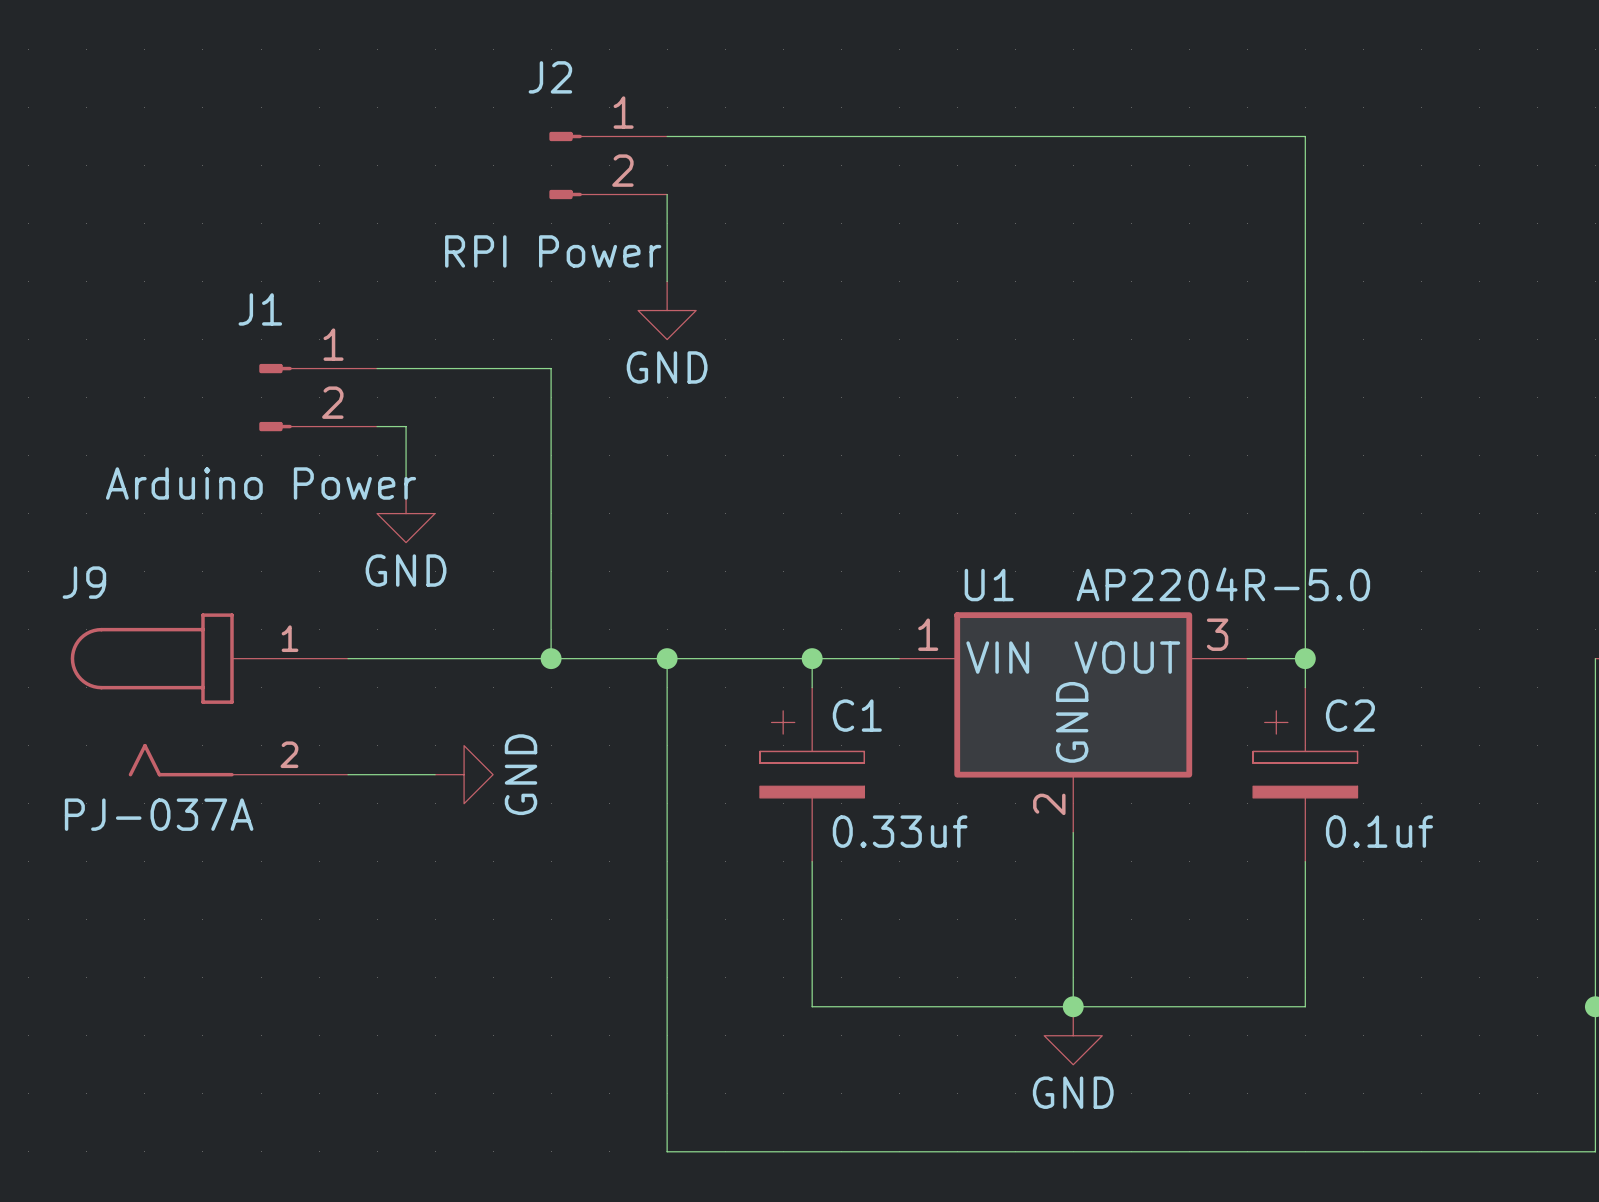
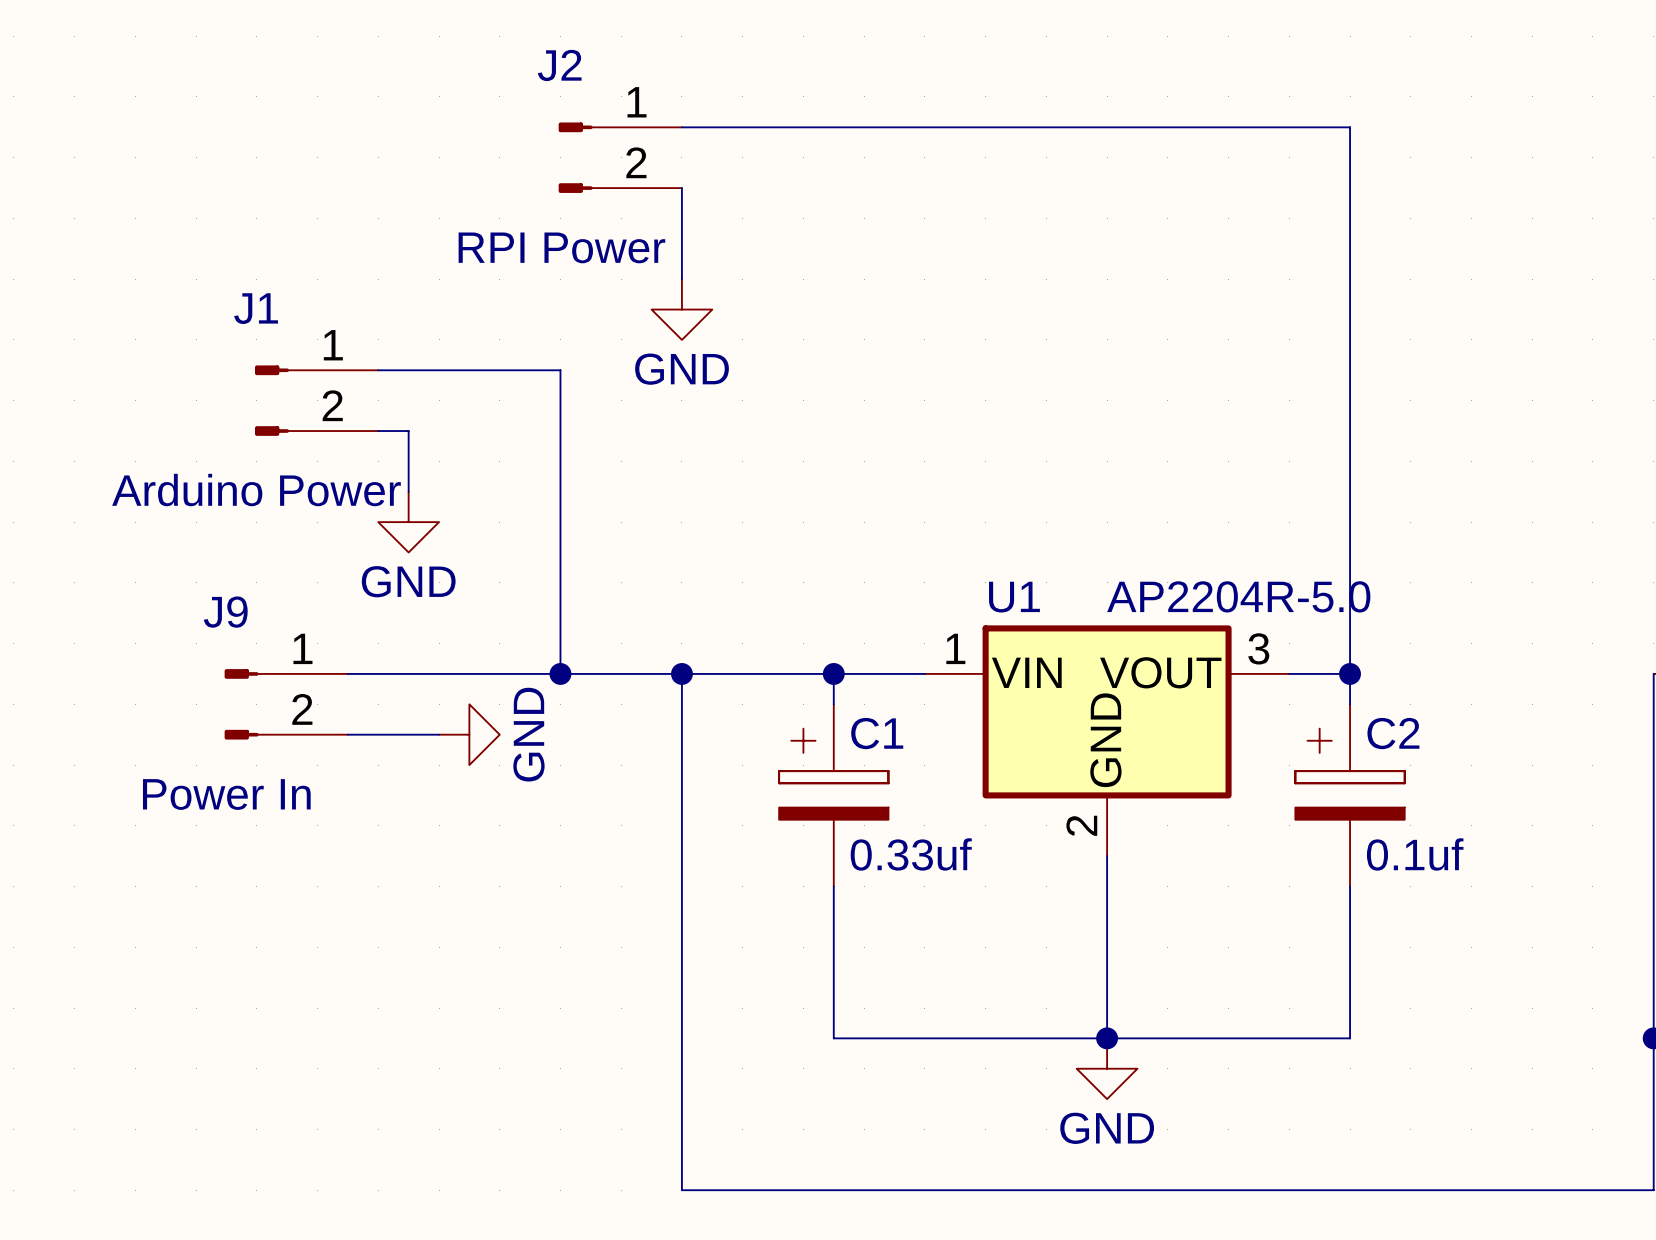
J9 name position: J9 (84, 582) -> J9 (225, 612)
J9 symbol: [70, 613, 349, 777] -> [224, 669, 348, 740]
wire: (348, 774) (435, 774) -> (347, 734) (439, 734)
power symbol position: GND (464, 774) -> GND (469, 734)
J9 value: PJ-037A (159, 814) -> Power In (226, 794)

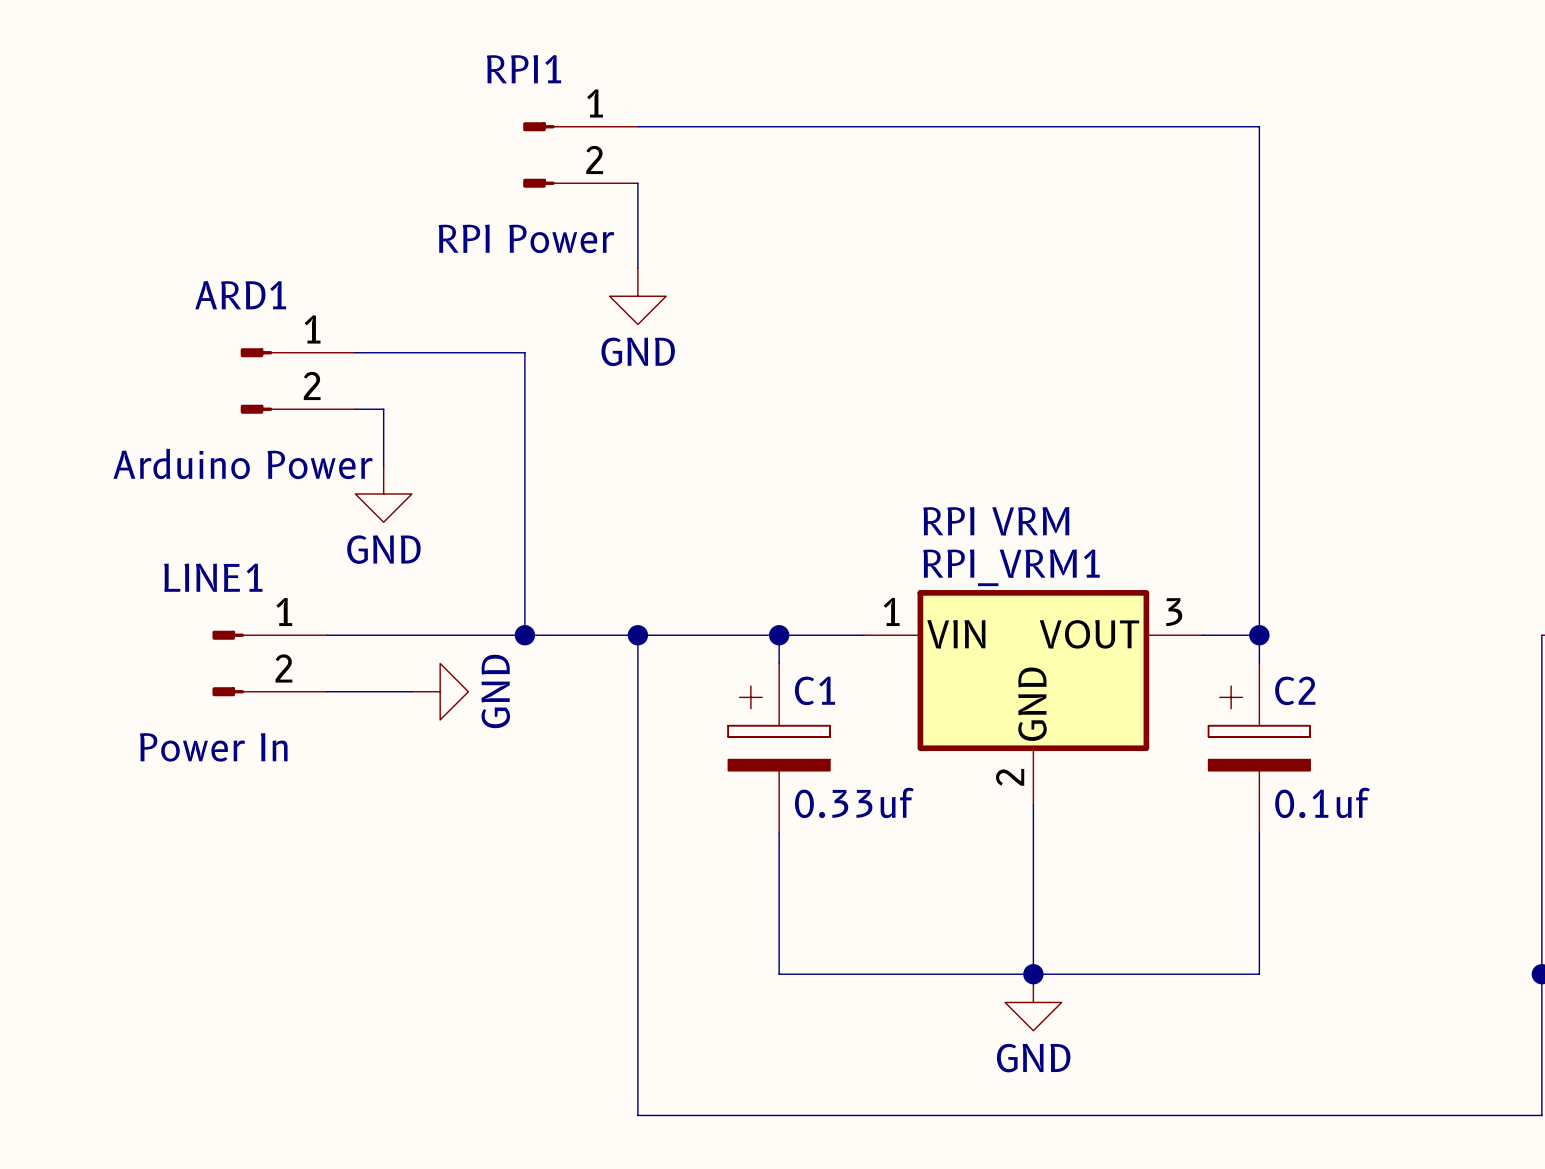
J2 name: J2 (559, 65) -> RPI1 (524, 69)
J1 name: J1 (256, 308) -> ARD1 (240, 295)
U1 value: AP2204R-5.0 (1238, 596) -> RPI VRM (996, 521)
U1 name: U1 (1014, 597) -> RPI_VRM1 (1011, 567)
J9 name: J9 (225, 612) -> LINE1 (213, 577)

